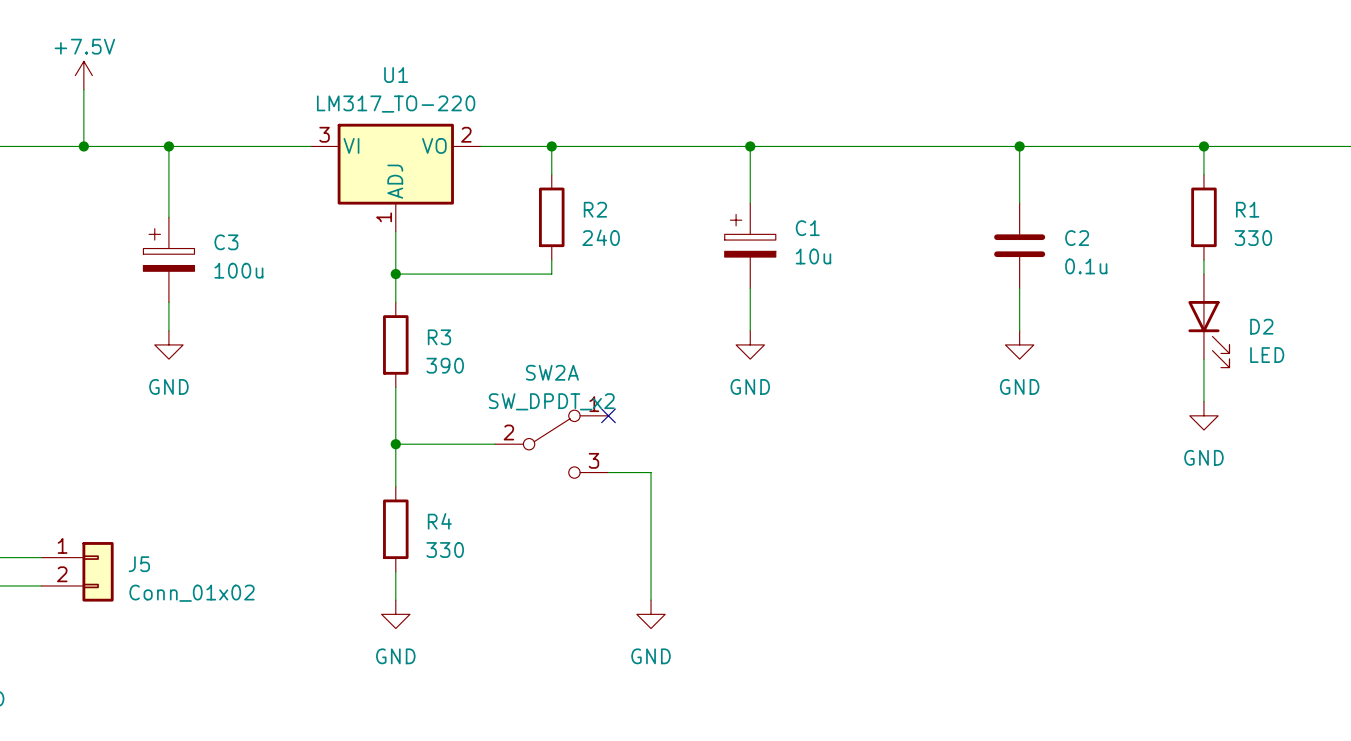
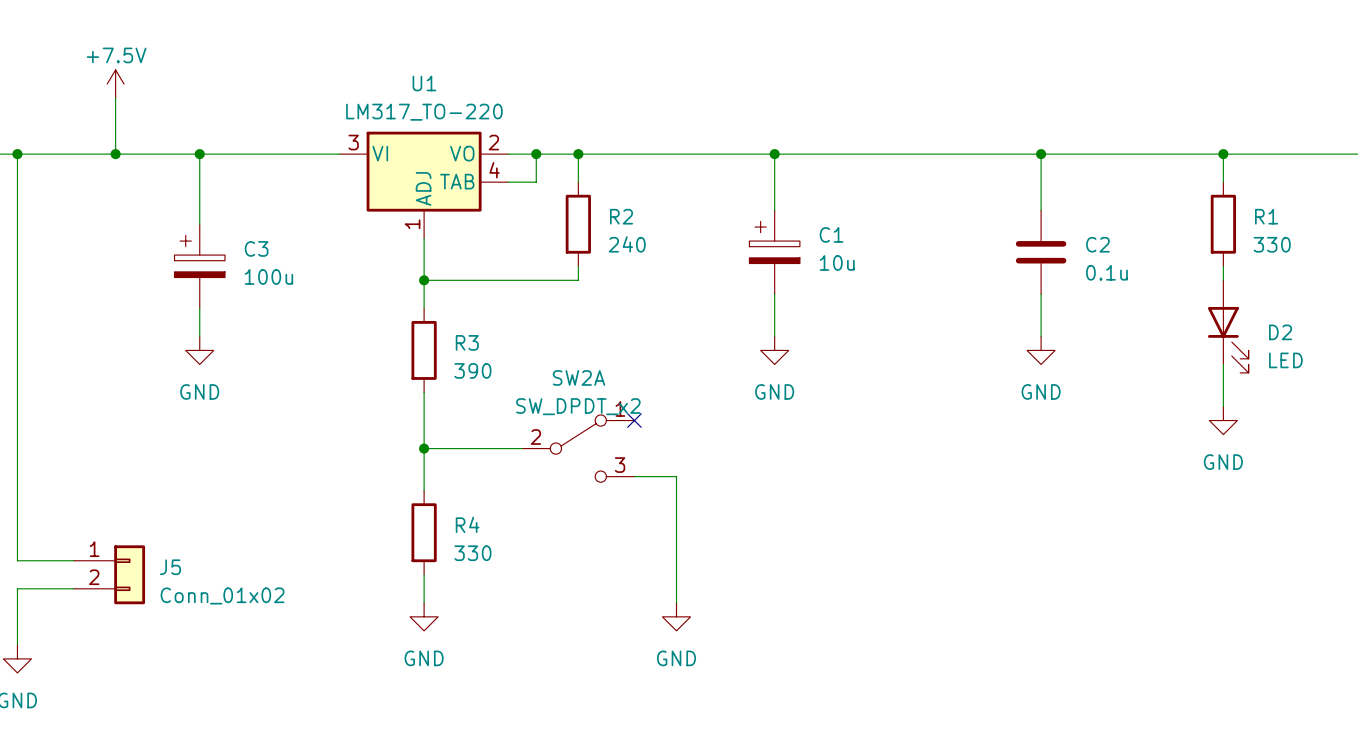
U1 symbol: [310, 123, 481, 232] -> [339, 131, 509, 239]
wire: none -> (536, 154) (536, 182) (508, 182)
junction: none -> (536, 154)

